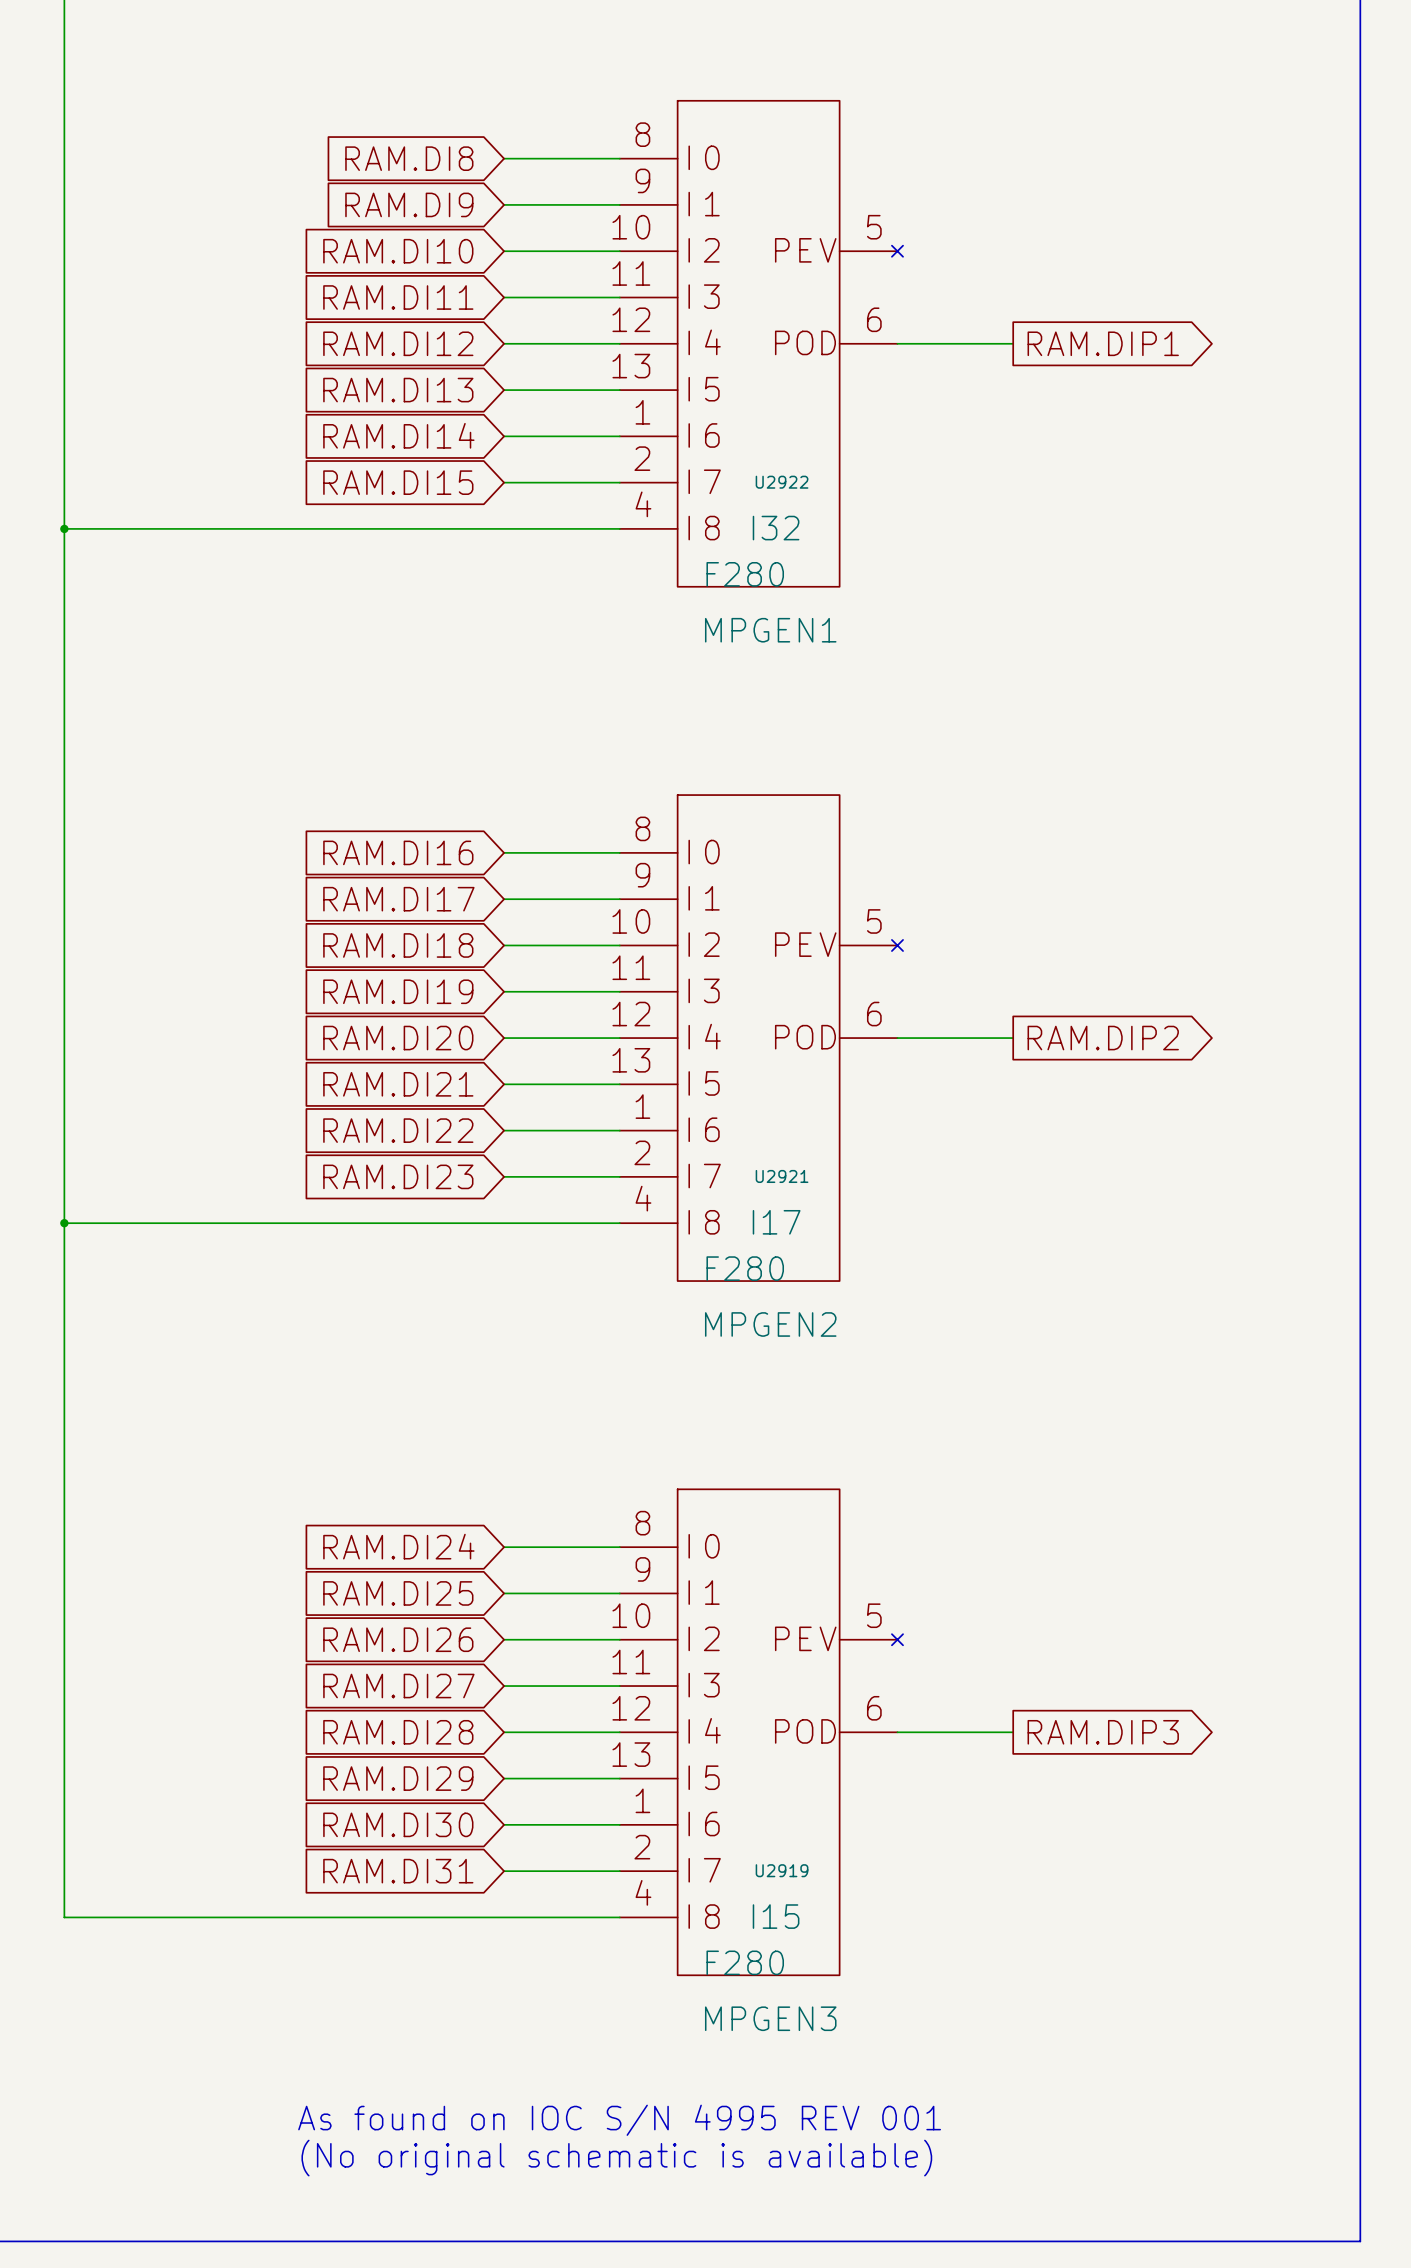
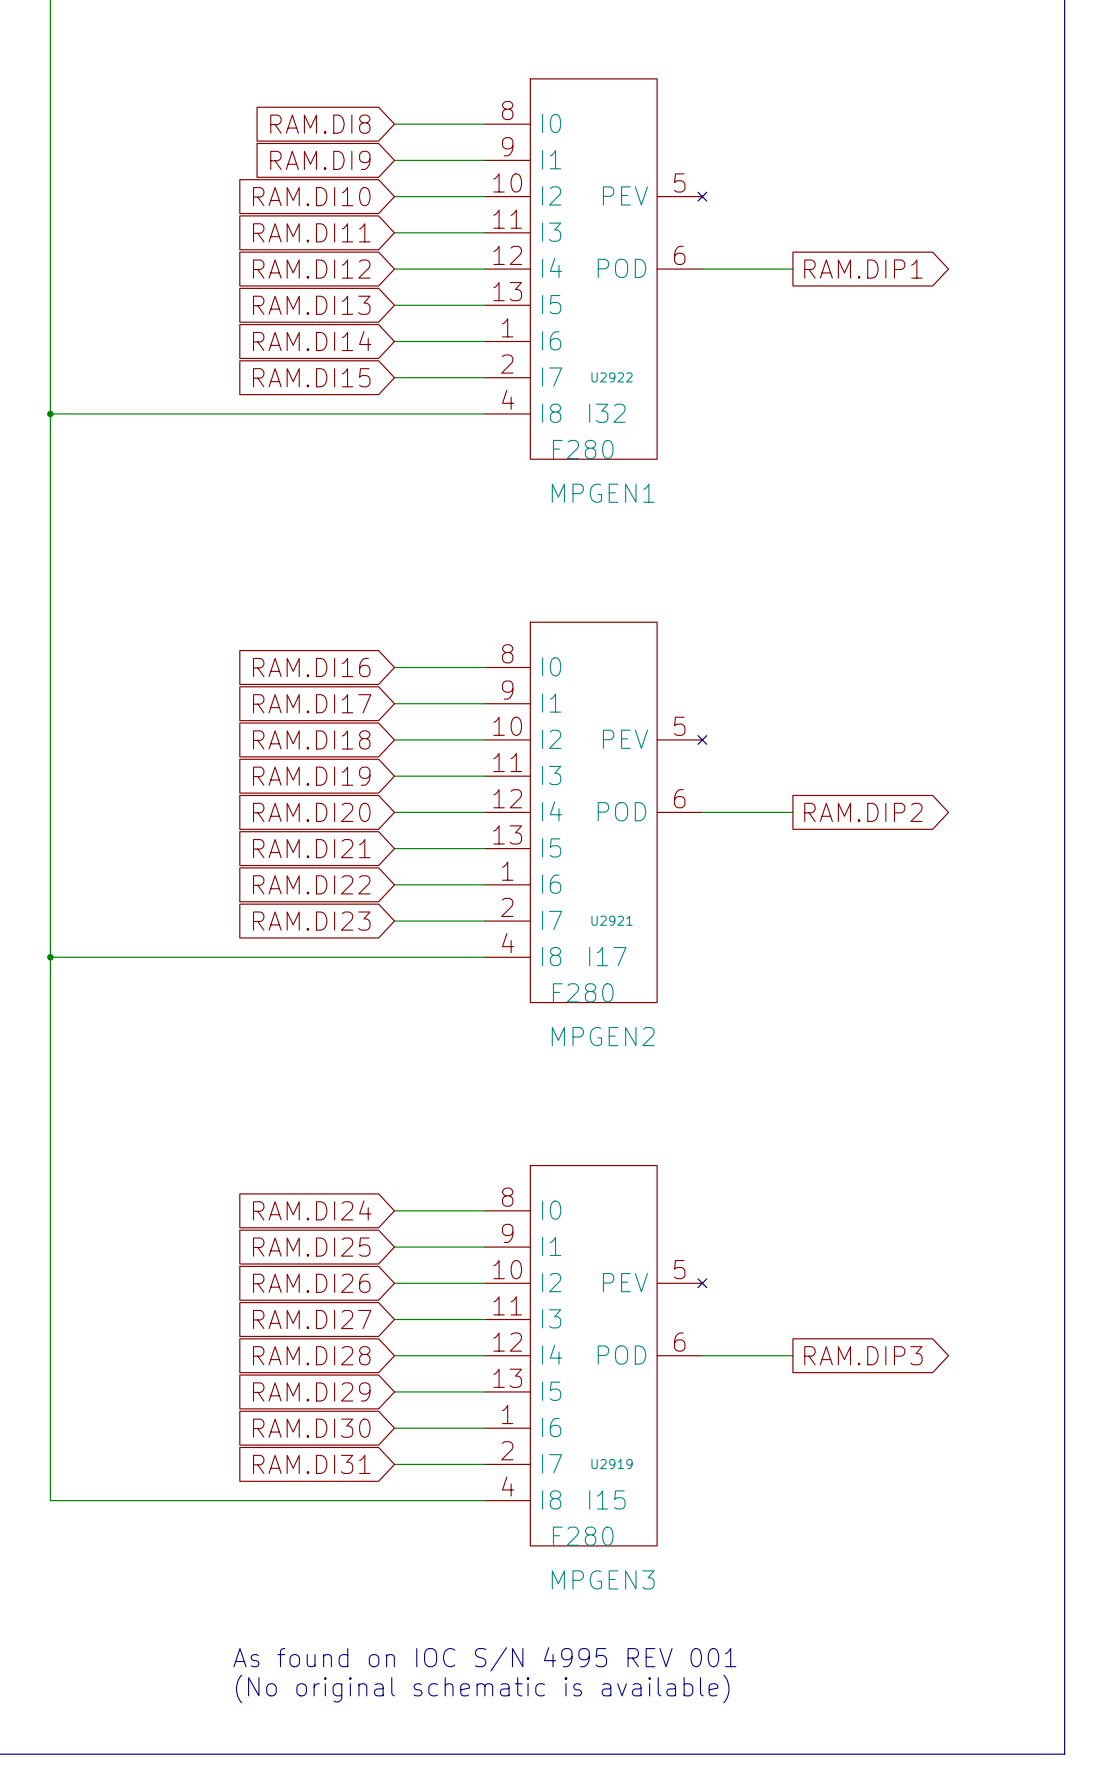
U2922 symbol: [619, 100, 898, 587] -> [485, 78, 703, 460]
U2921 symbol: [619, 795, 898, 1282] -> [485, 622, 703, 1003]
U2919 symbol: [619, 1489, 898, 1976] -> [485, 1165, 703, 1546]

